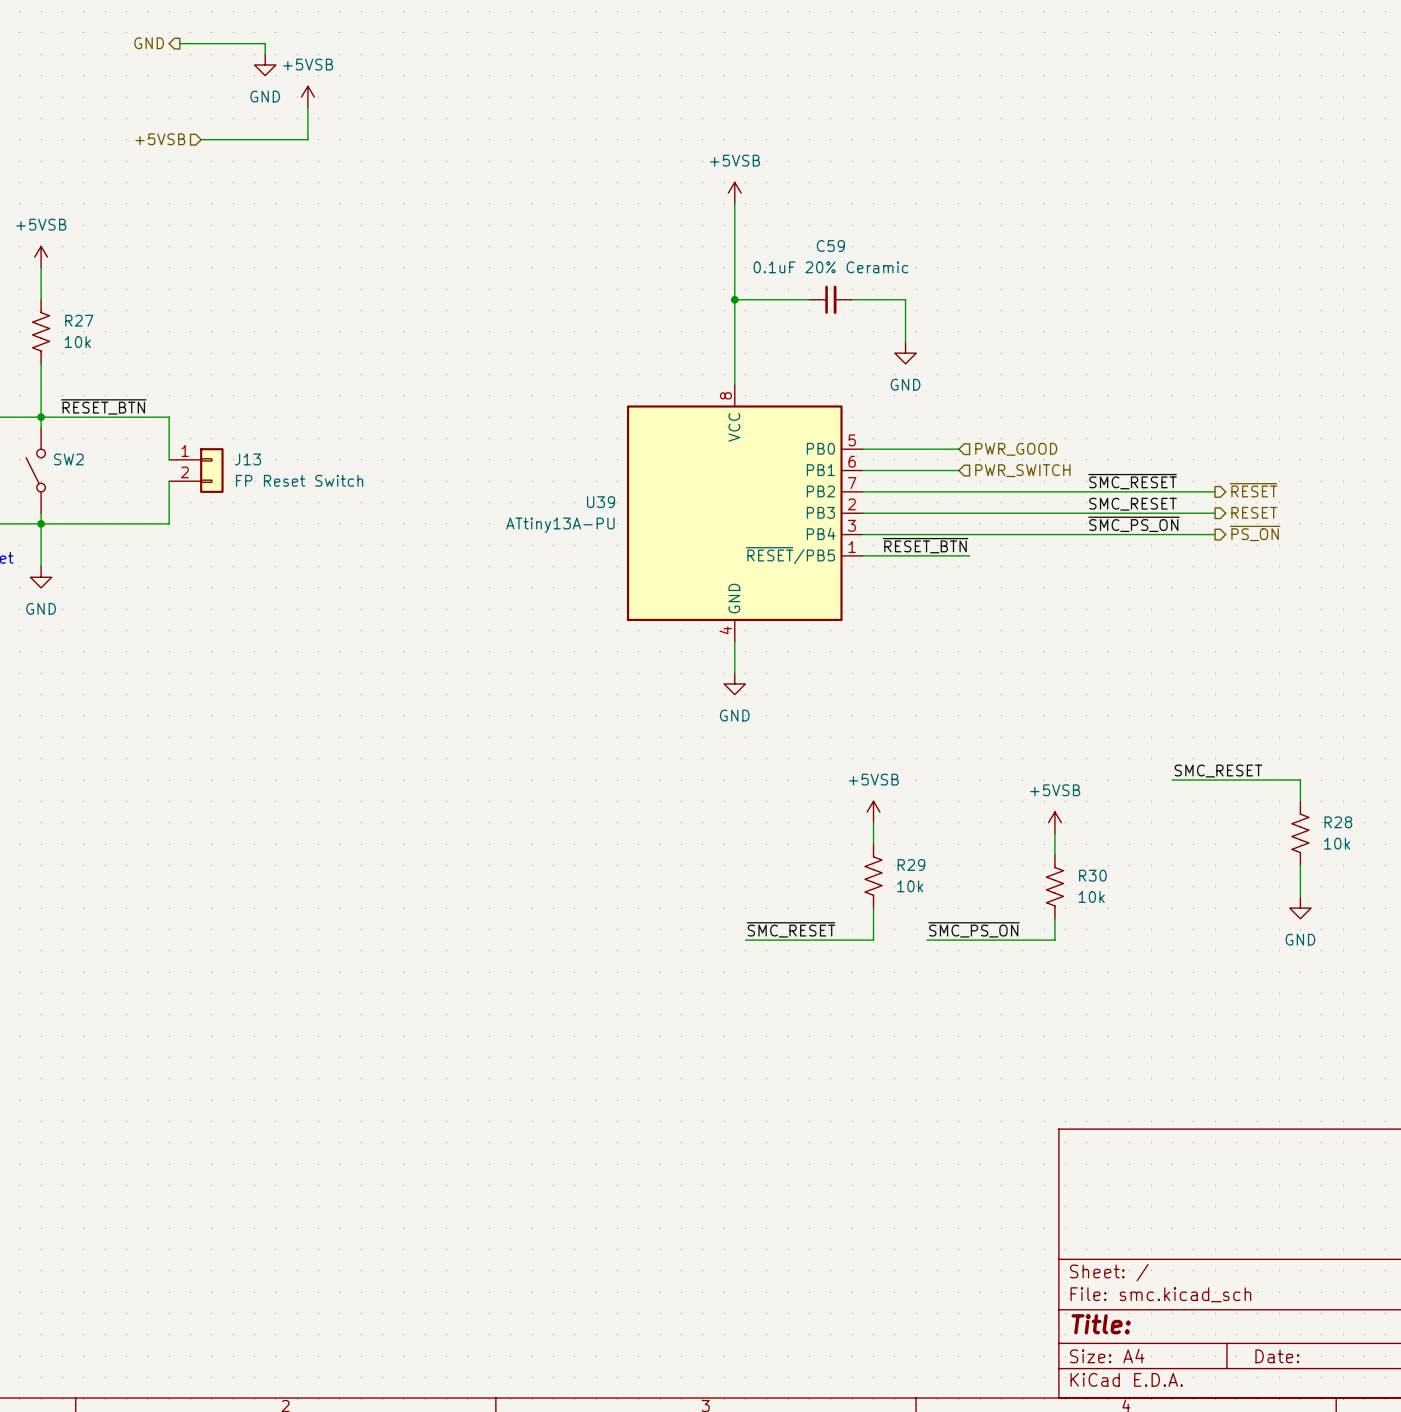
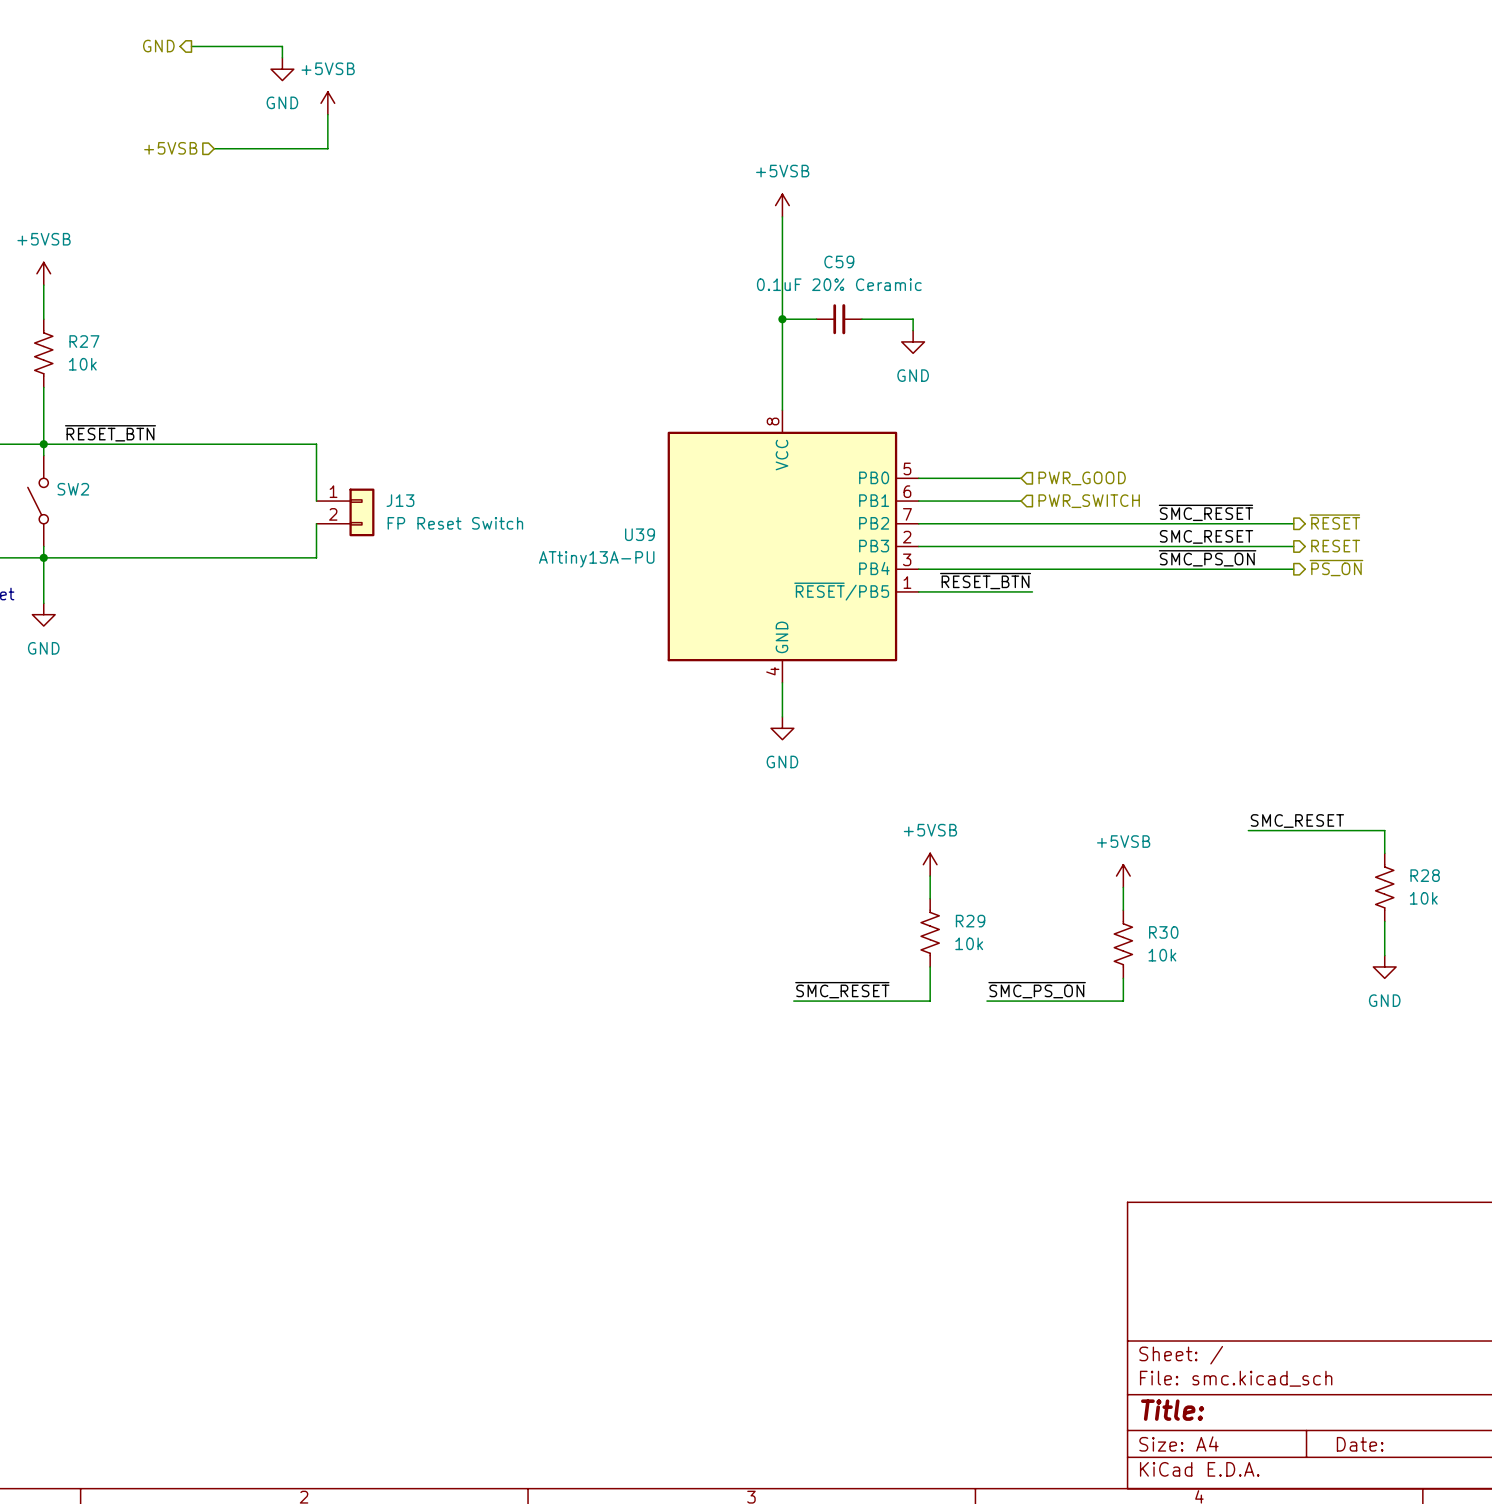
C59 position: (830, 299) -> (839, 319)
wire: (857, 299) (905, 299) (905, 342) -> (913, 319) (913, 330)
power symbol position: GND (905, 353) -> GND (913, 341)
wire: (169, 417) (169, 459) -> (180, 444) (316, 444) (316, 501)
J13 position: (196, 470) -> (345, 512)
wire: (169, 481) (169, 523) -> (316, 523) (316, 557) (180, 557)

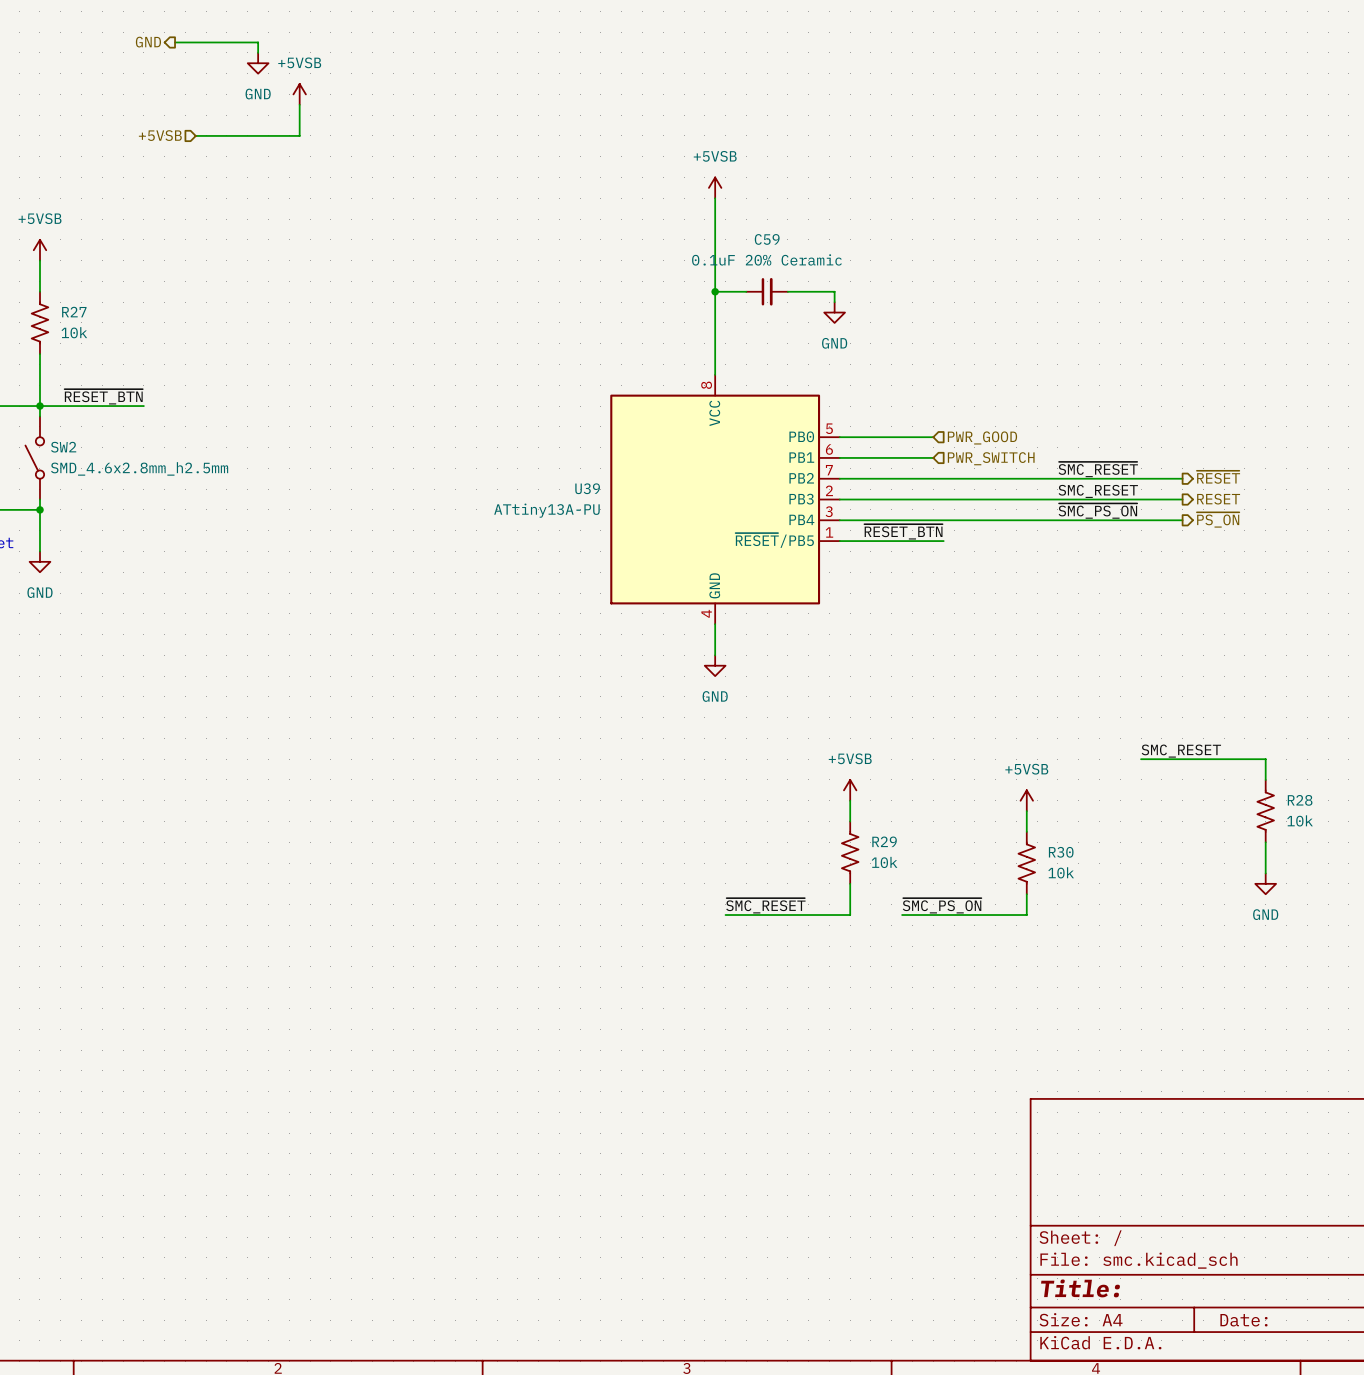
wire: (157, 444) (316, 444) (316, 501) -> none
SW2 value: none -> SMD_4.6x2.8mm_h2.5mm (139, 468)
J13: FP Reset Switch (345, 512) -> none
wire: (316, 523) (316, 557) (43, 557) -> none

